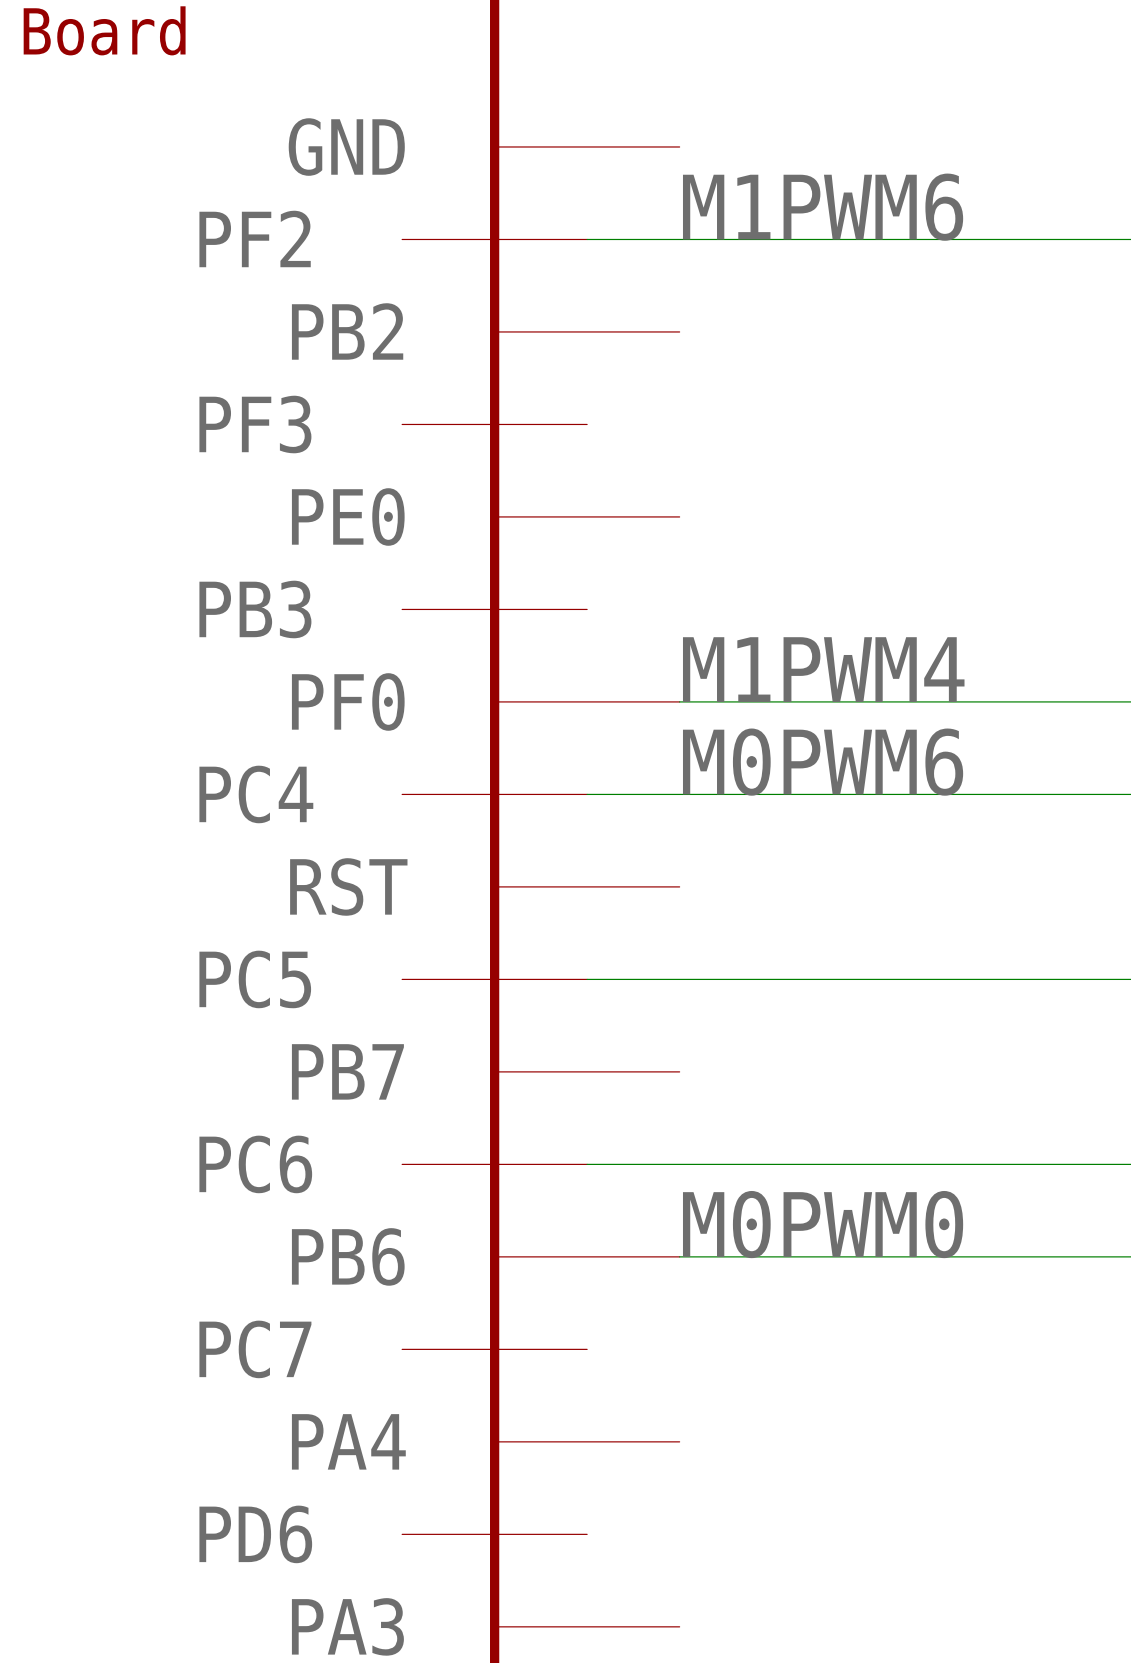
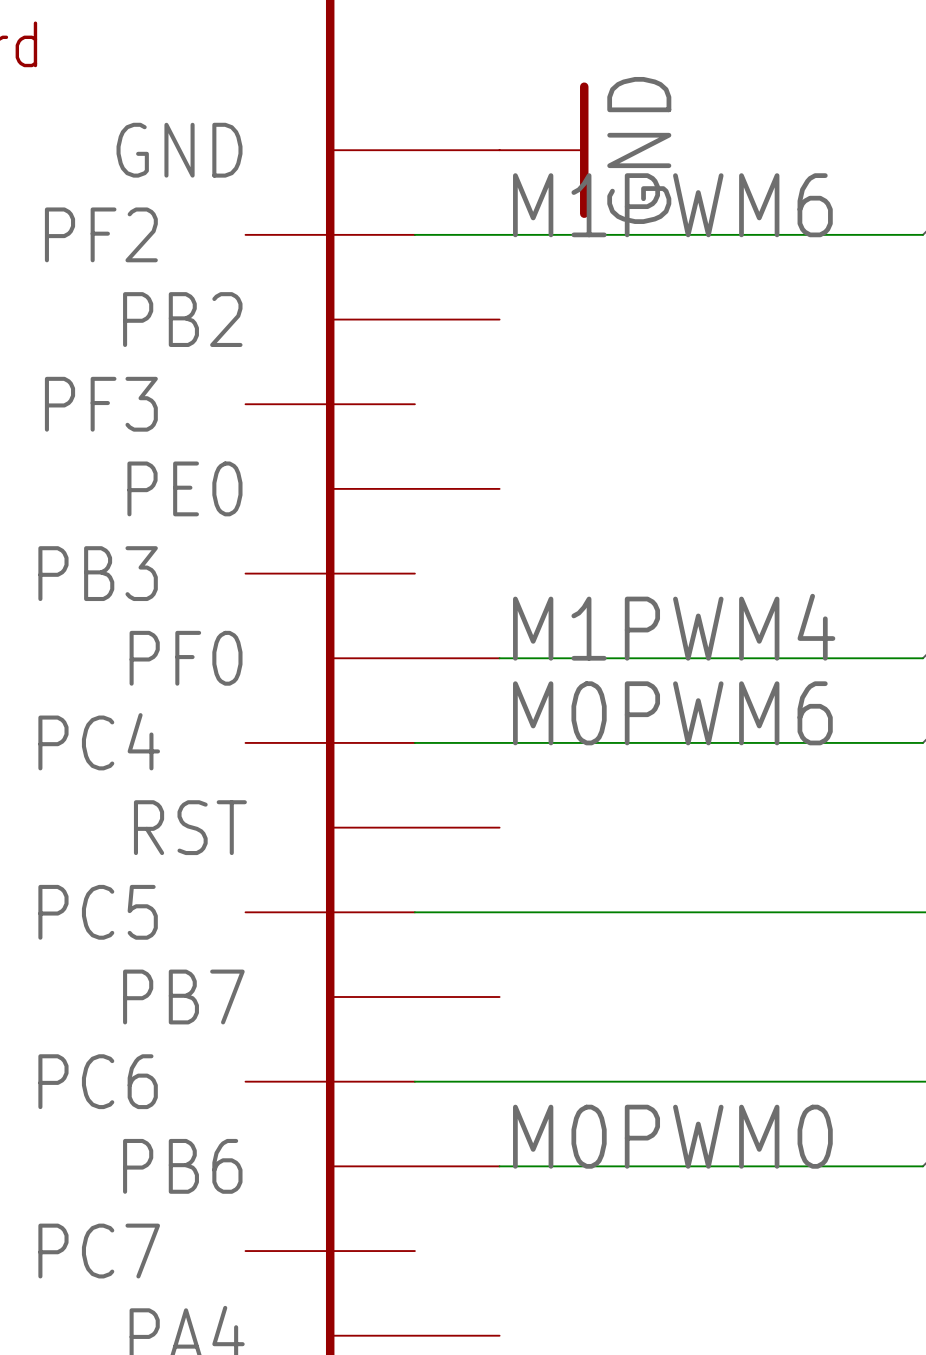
power symbol: none -> GND (544, 150)

